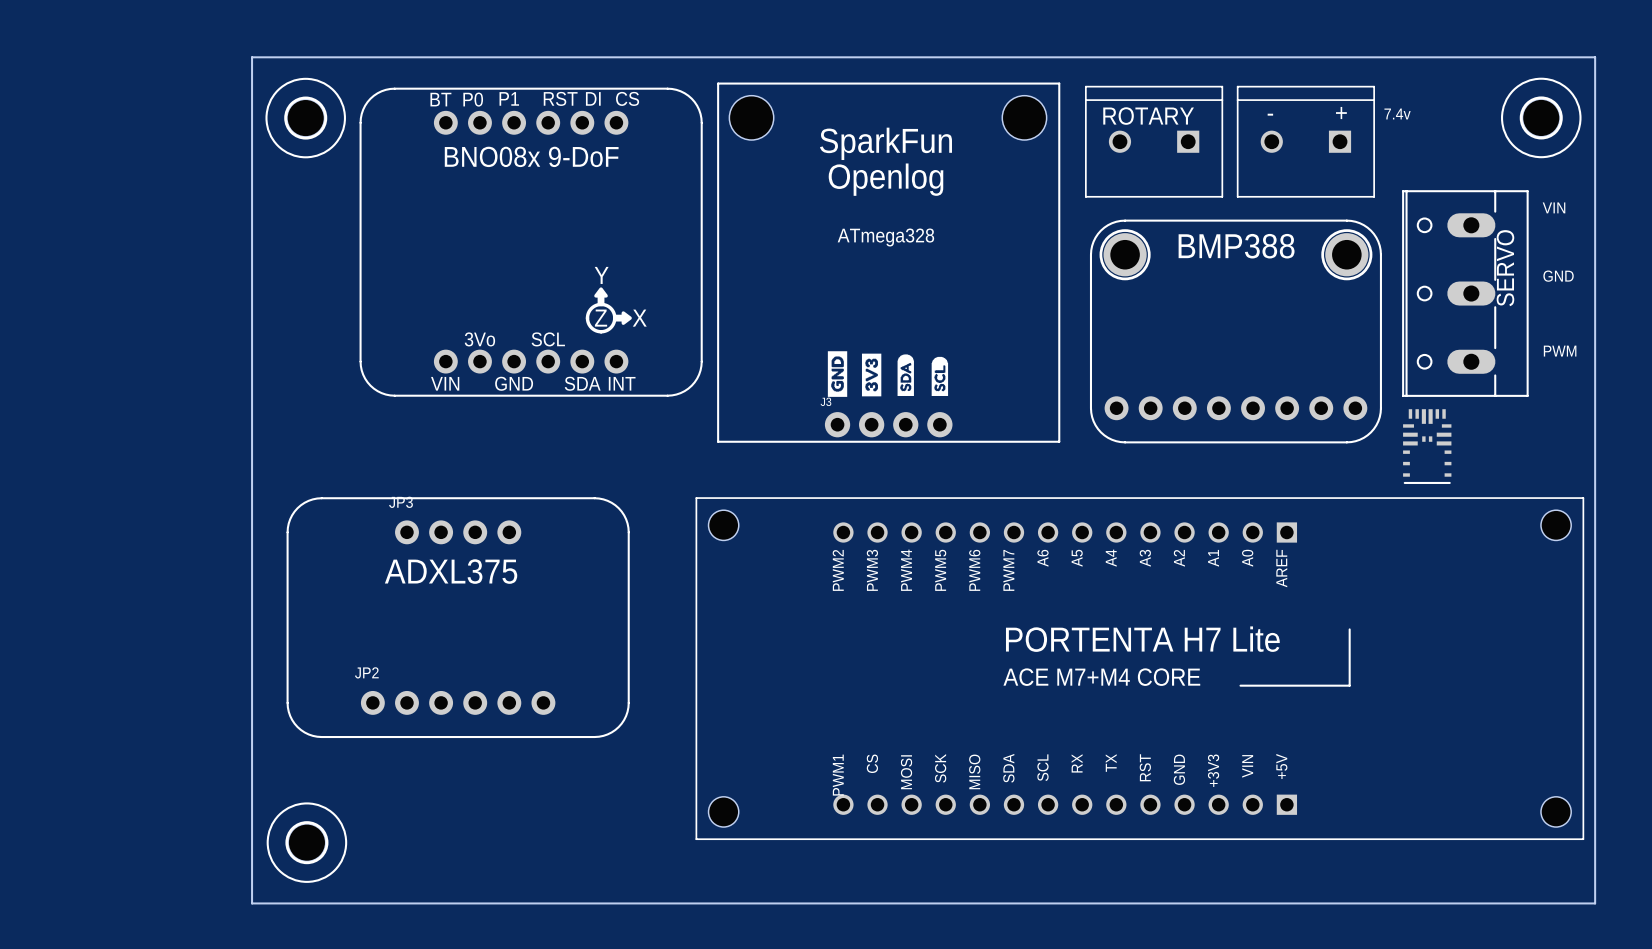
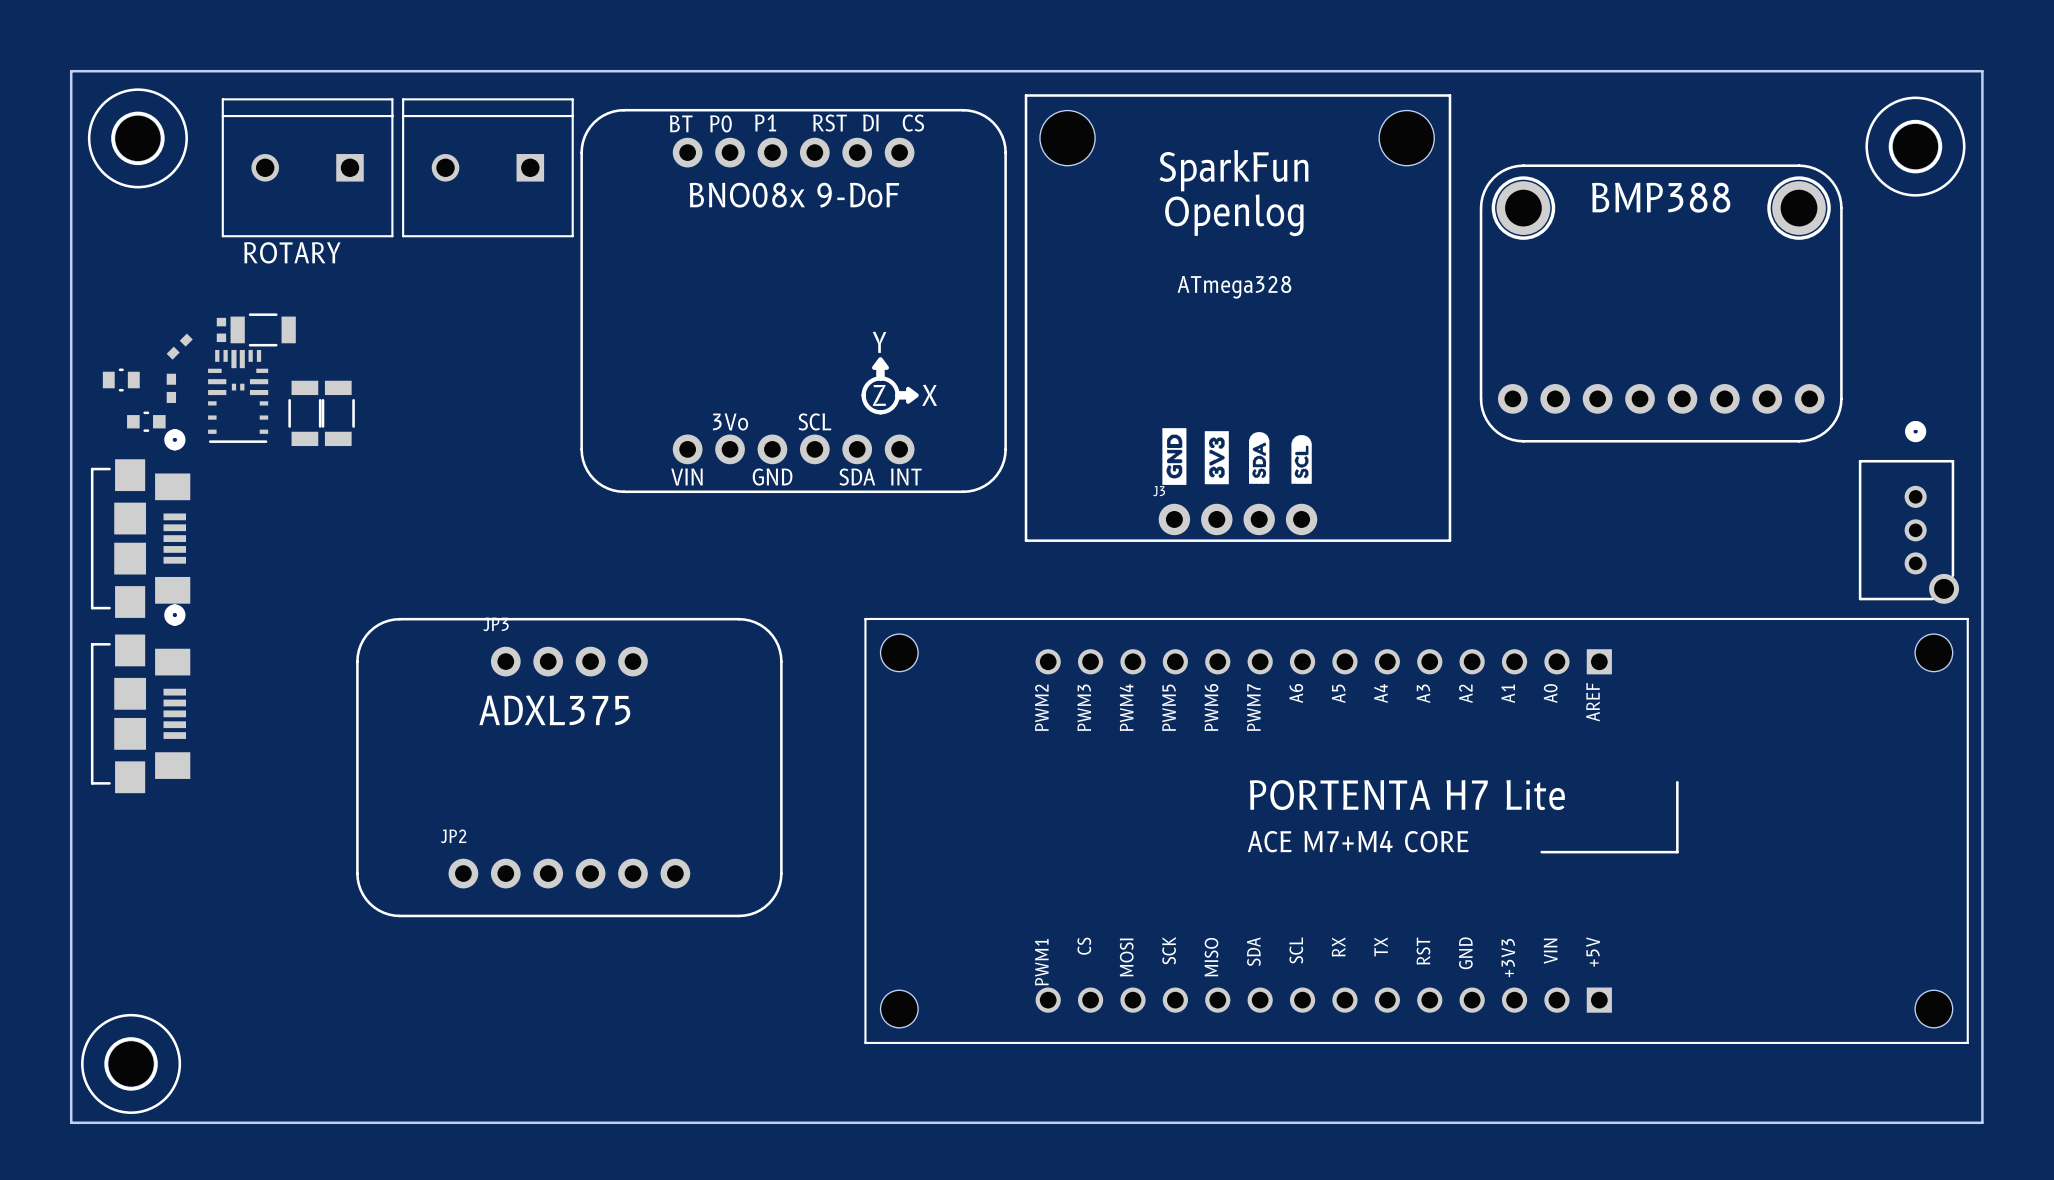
board edge: (252, 57) (252, 903) -> (313, 71) (71, 71) (71, 1122) (313, 1122)
line: (718, 83) (718, 441) (1059, 441) (1059, 83) (718, 83) -> (1026, 95) (1026, 540) (1449, 540) (1449, 95) (1026, 95)
part: none -> (1067, 138)
part: none -> (1406, 138)
text: + (1341, 113) -> none
text: 7.4v (1397, 113) -> none
text: - (1270, 114) -> none
text: ROTARY (1148, 116) -> none
part: (751, 117) -> none
part: (1024, 117) -> none
part position: (305, 118) -> (137, 138)
part: none -> (307, 167)
part: none -> (487, 167)
part: (1154, 141) -> none
part: (1305, 141) -> none
text position: SparkFun (885, 143) -> SparkFun (1233, 170)
part: none -> (1523, 208)
part: none -> (1799, 208)
text position: Openlog (886, 179) -> Openlog (1234, 215)
text: none -> ROTARY (292, 252)
text: VIN (1554, 207) -> none
line: (1125, 220) (1346, 220) (1355, 221) (1367, 227) (1378, 241) (1380, 254) (1380, 408) (1379, 417) (1373, 429) (1359, 439) (1346, 442) (1125, 442) (1116, 441) (1104, 435) (1095, 425) (1091, 412) (1091, 250) (1093, 241) (1100, 230) (1112, 223) (1125, 220) -> (1523, 165) (1799, 165) (1809, 167) (1824, 174) (1838, 191) (1841, 208) (1841, 398) (1839, 409) (1832, 424) (1815, 438) (1799, 441) (1523, 441) (1512, 439) (1497, 432) (1486, 420) (1481, 404) (1481, 202) (1484, 191) (1493, 178) (1507, 168) (1523, 165)
text position: ATmega328 (885, 237) -> ATmega328 (1234, 287)
part position: (531, 242) -> (793, 300)
text position: BMP388 (1236, 246) -> BMP388 (1661, 197)
part: (1125, 254) -> none
part: (1346, 254) -> none
part: none -> (221, 329)
part: none -> (263, 329)
text: GND (1558, 276) -> none
part: none -> (179, 346)
SERVO: (1465, 293) -> none
part: none -> (121, 380)
part: none -> (171, 388)
part: none -> (238, 396)
part: none -> (304, 413)
part: none -> (338, 413)
part: none -> (146, 421)
text: PWM (1560, 351) -> none
drawing position: (837, 374) -> (1174, 456)
drawing position: (871, 374) -> (1216, 457)
drawing position: (905, 375) -> (1259, 457)
drawing position: (939, 376) -> (1301, 459)
part position: (1235, 408) -> (1661, 398)
part: none -> (1908, 512)
part: none -> (140, 523)
J3 position: (888, 424) -> (1237, 519)
part: (1427, 446) -> none
part: none -> (140, 698)
part position: (306, 842) -> (131, 1063)

